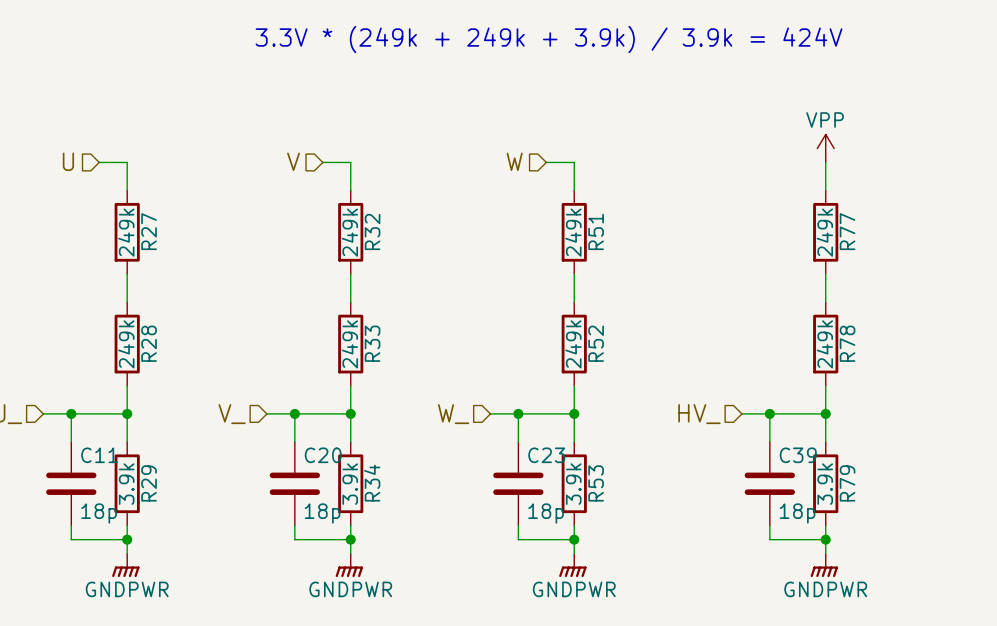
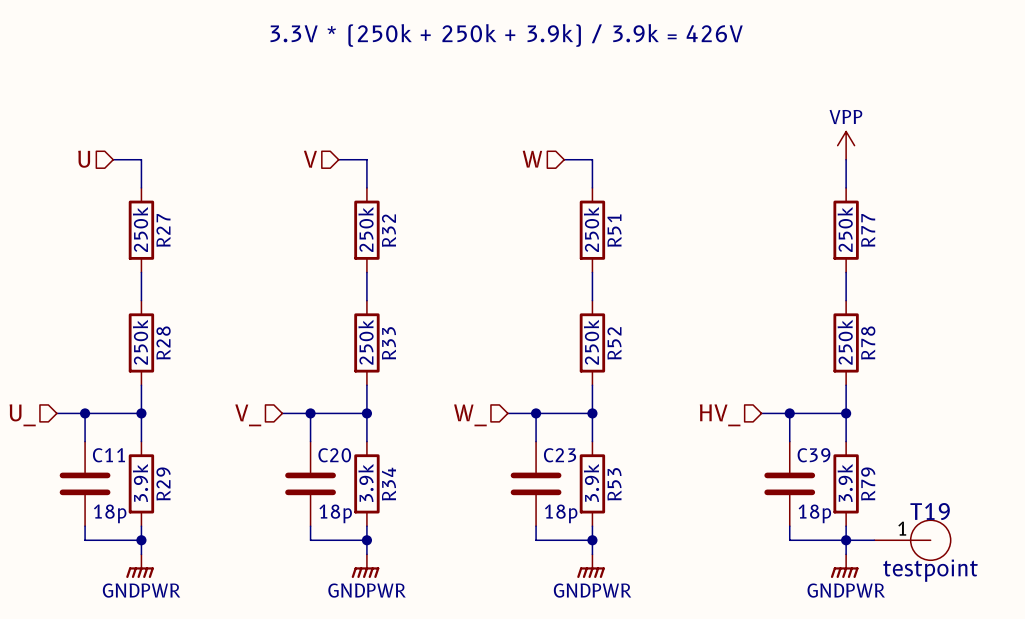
text: 3.3V * (249k + 249k + 3.9k) / 3.9k = 424V (549, 39) -> 3.3V * (250k + 250k + 3.9k) / 3.9k = 426V (506, 35)
R27 value: 249k (126, 232) -> 250k (140, 229)
R32 value: 249k (349, 232) -> 250k (366, 229)
R51 value: 249k (573, 232) -> 250k (591, 229)
R77 value: 249k (824, 232) -> 250k (845, 229)
R28 value: 249k (126, 344) -> 250k (140, 342)
R33 value: 249k (349, 344) -> 250k (366, 342)
R52 value: 249k (573, 344) -> 250k (591, 342)
R78 value: 249k (824, 344) -> 250k (845, 342)
wire: none -> (846, 540) (874, 540)
T19: none -> testpoint (912, 540)

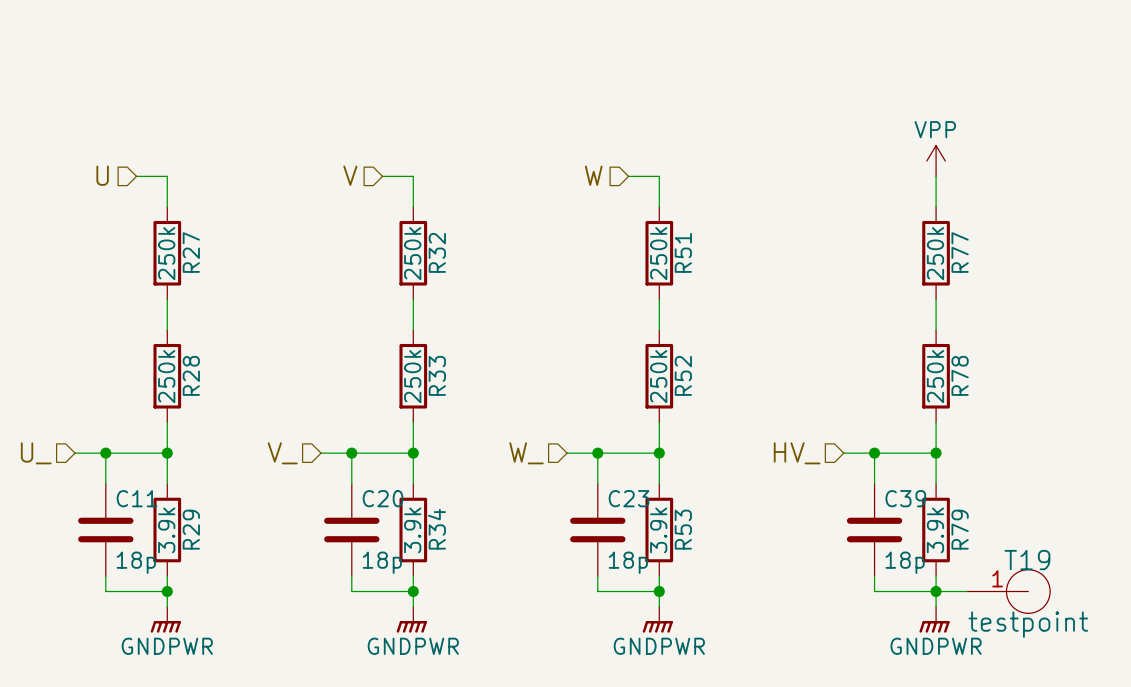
text: 3.3V * (250k + 250k + 3.9k) / 3.9k = 426V (506, 35) -> none

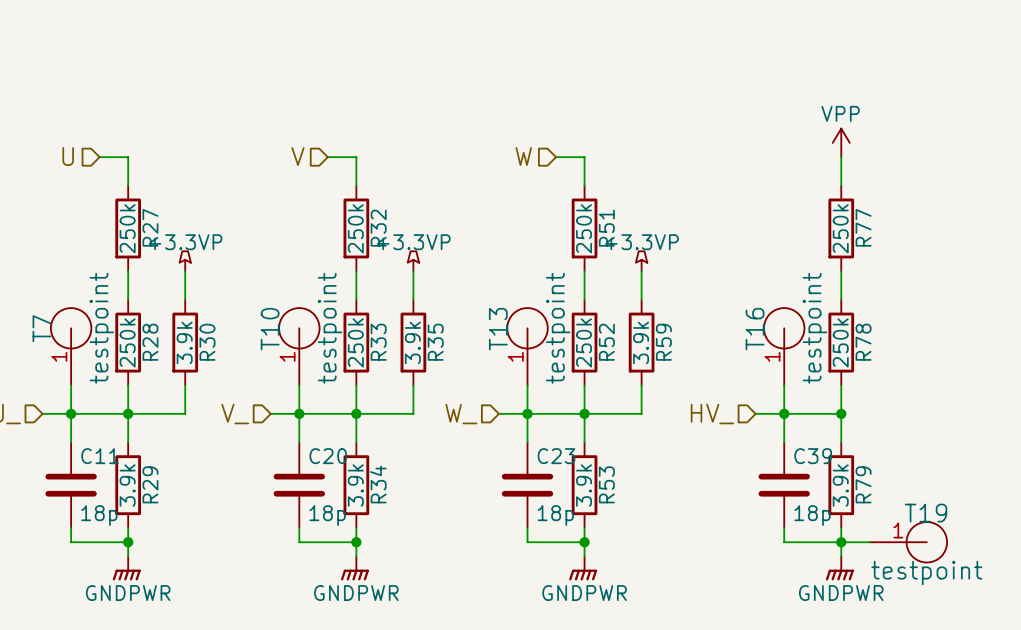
power symbol: none -> +3.3VP (185, 261)
power symbol: none -> +3.3VP (413, 261)
power symbol: none -> +3.3VP (641, 261)
wire: none -> (185, 271) (185, 299)
wire: none -> (413, 271) (413, 299)
wire: none -> (641, 271) (641, 299)
R30: none -> 3.9k (185, 342)
R35: none -> 3.9k (413, 342)
R59: none -> 3.9k (641, 342)
T7: none -> testpoint (71, 346)
T10: none -> testpoint (299, 346)
T13: none -> testpoint (527, 346)
T16: none -> testpoint (784, 346)
wire: none -> (71, 385) (71, 413)
wire: none -> (185, 385) (185, 413) (128, 413)
wire: none -> (299, 385) (299, 413)
wire: none -> (413, 385) (413, 413) (356, 413)
wire: none -> (527, 385) (527, 413)
wire: none -> (641, 385) (641, 413) (584, 413)
wire: none -> (784, 385) (784, 413)

